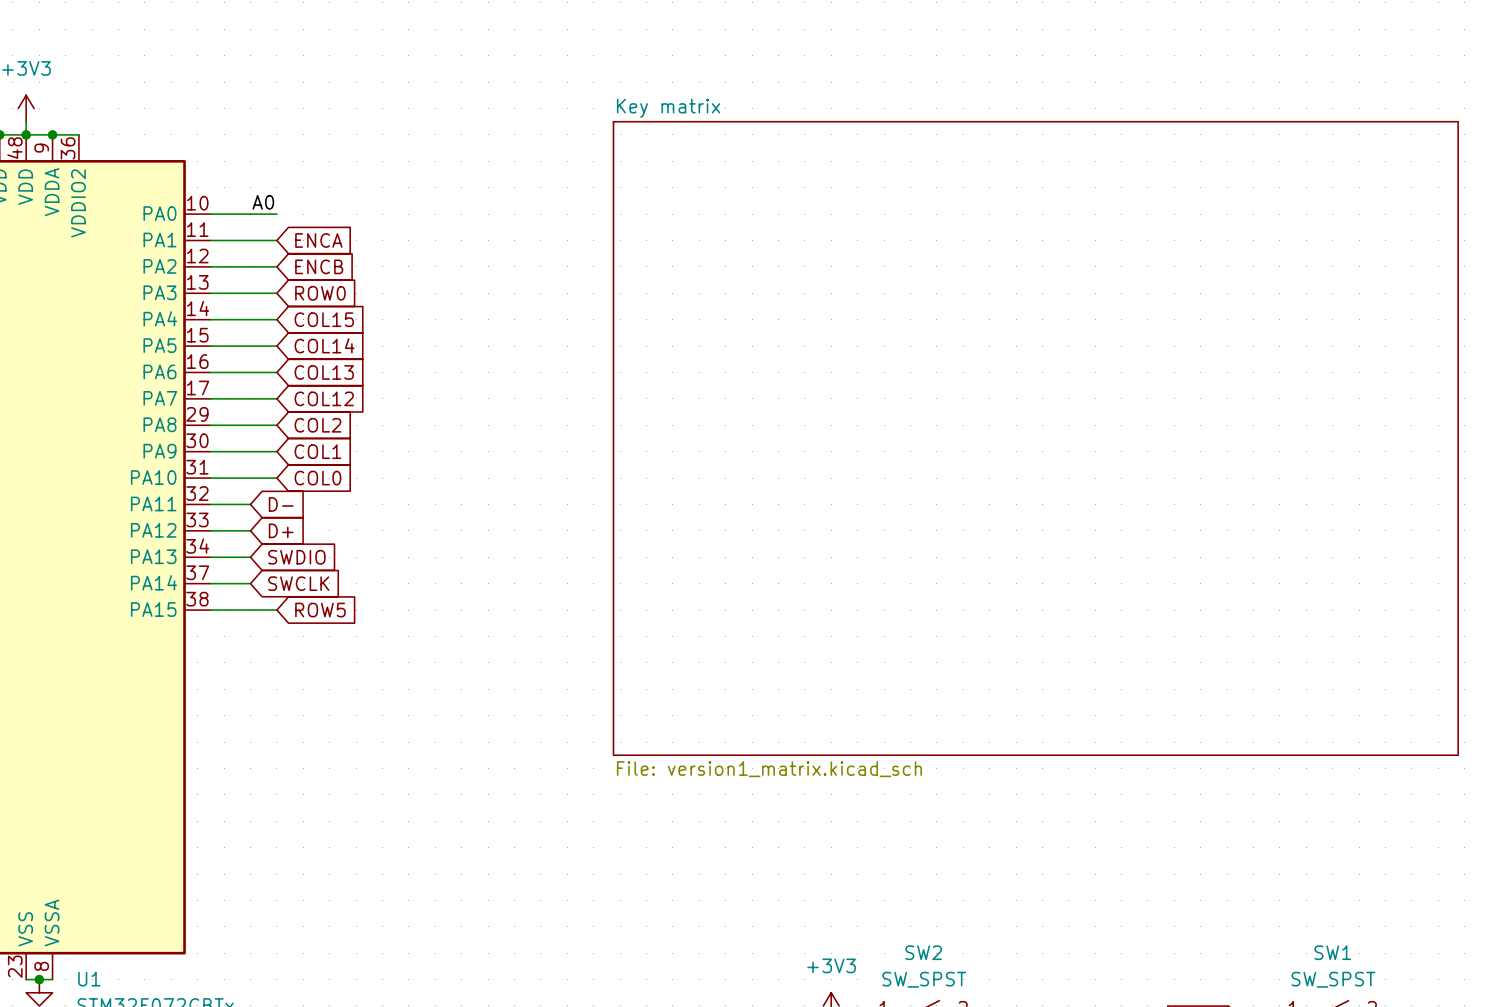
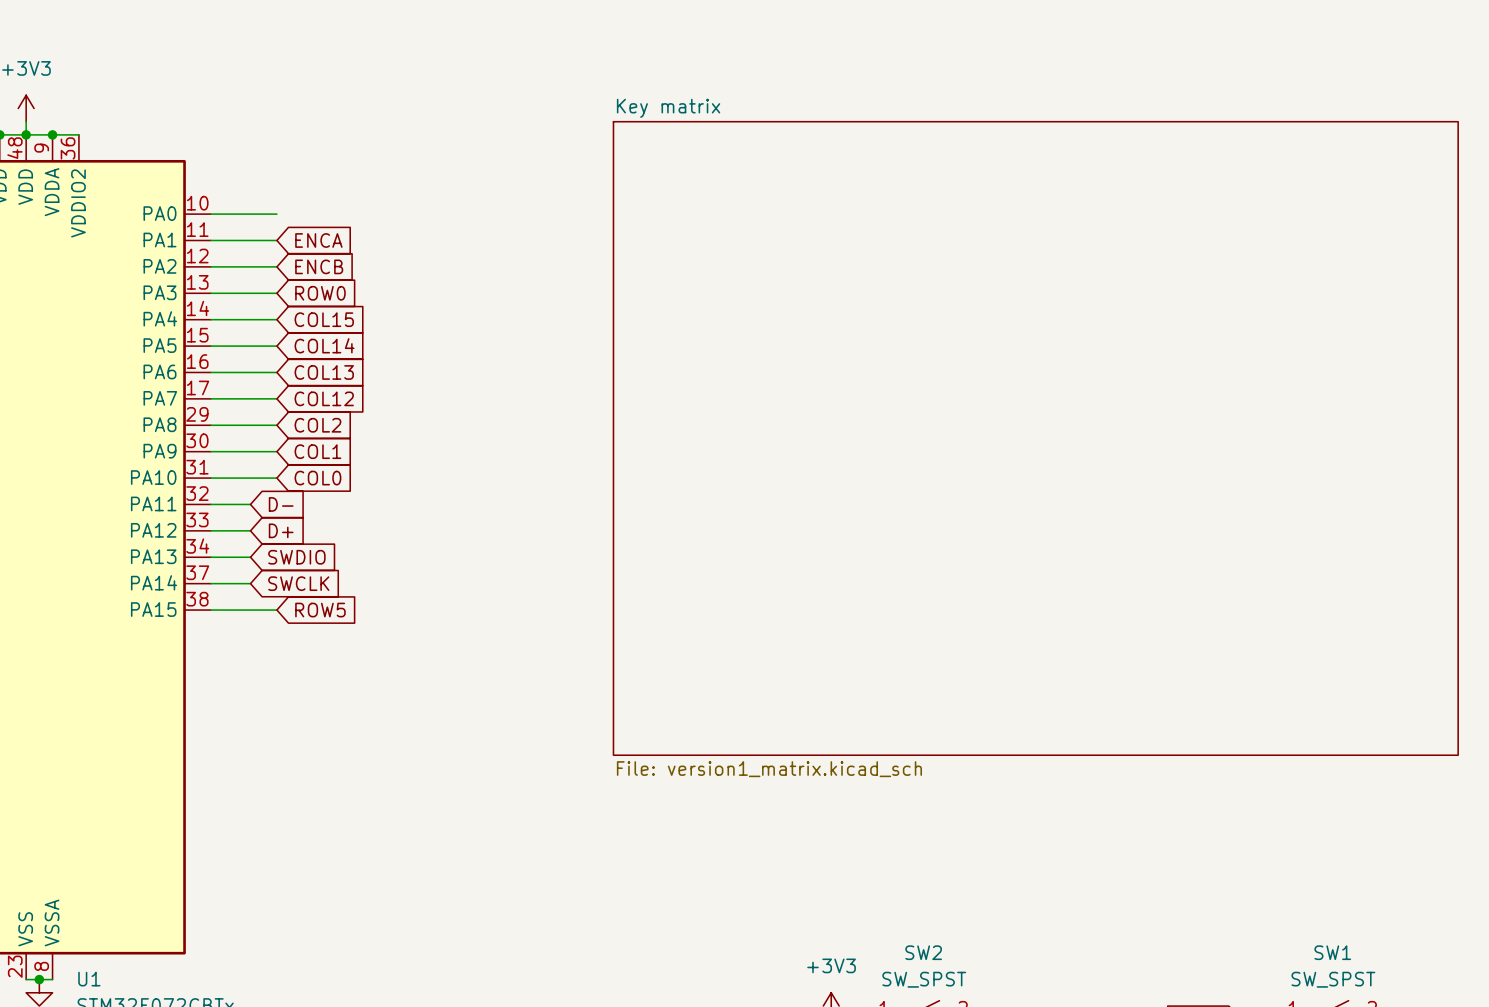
label: A0 (263, 202) -> none

